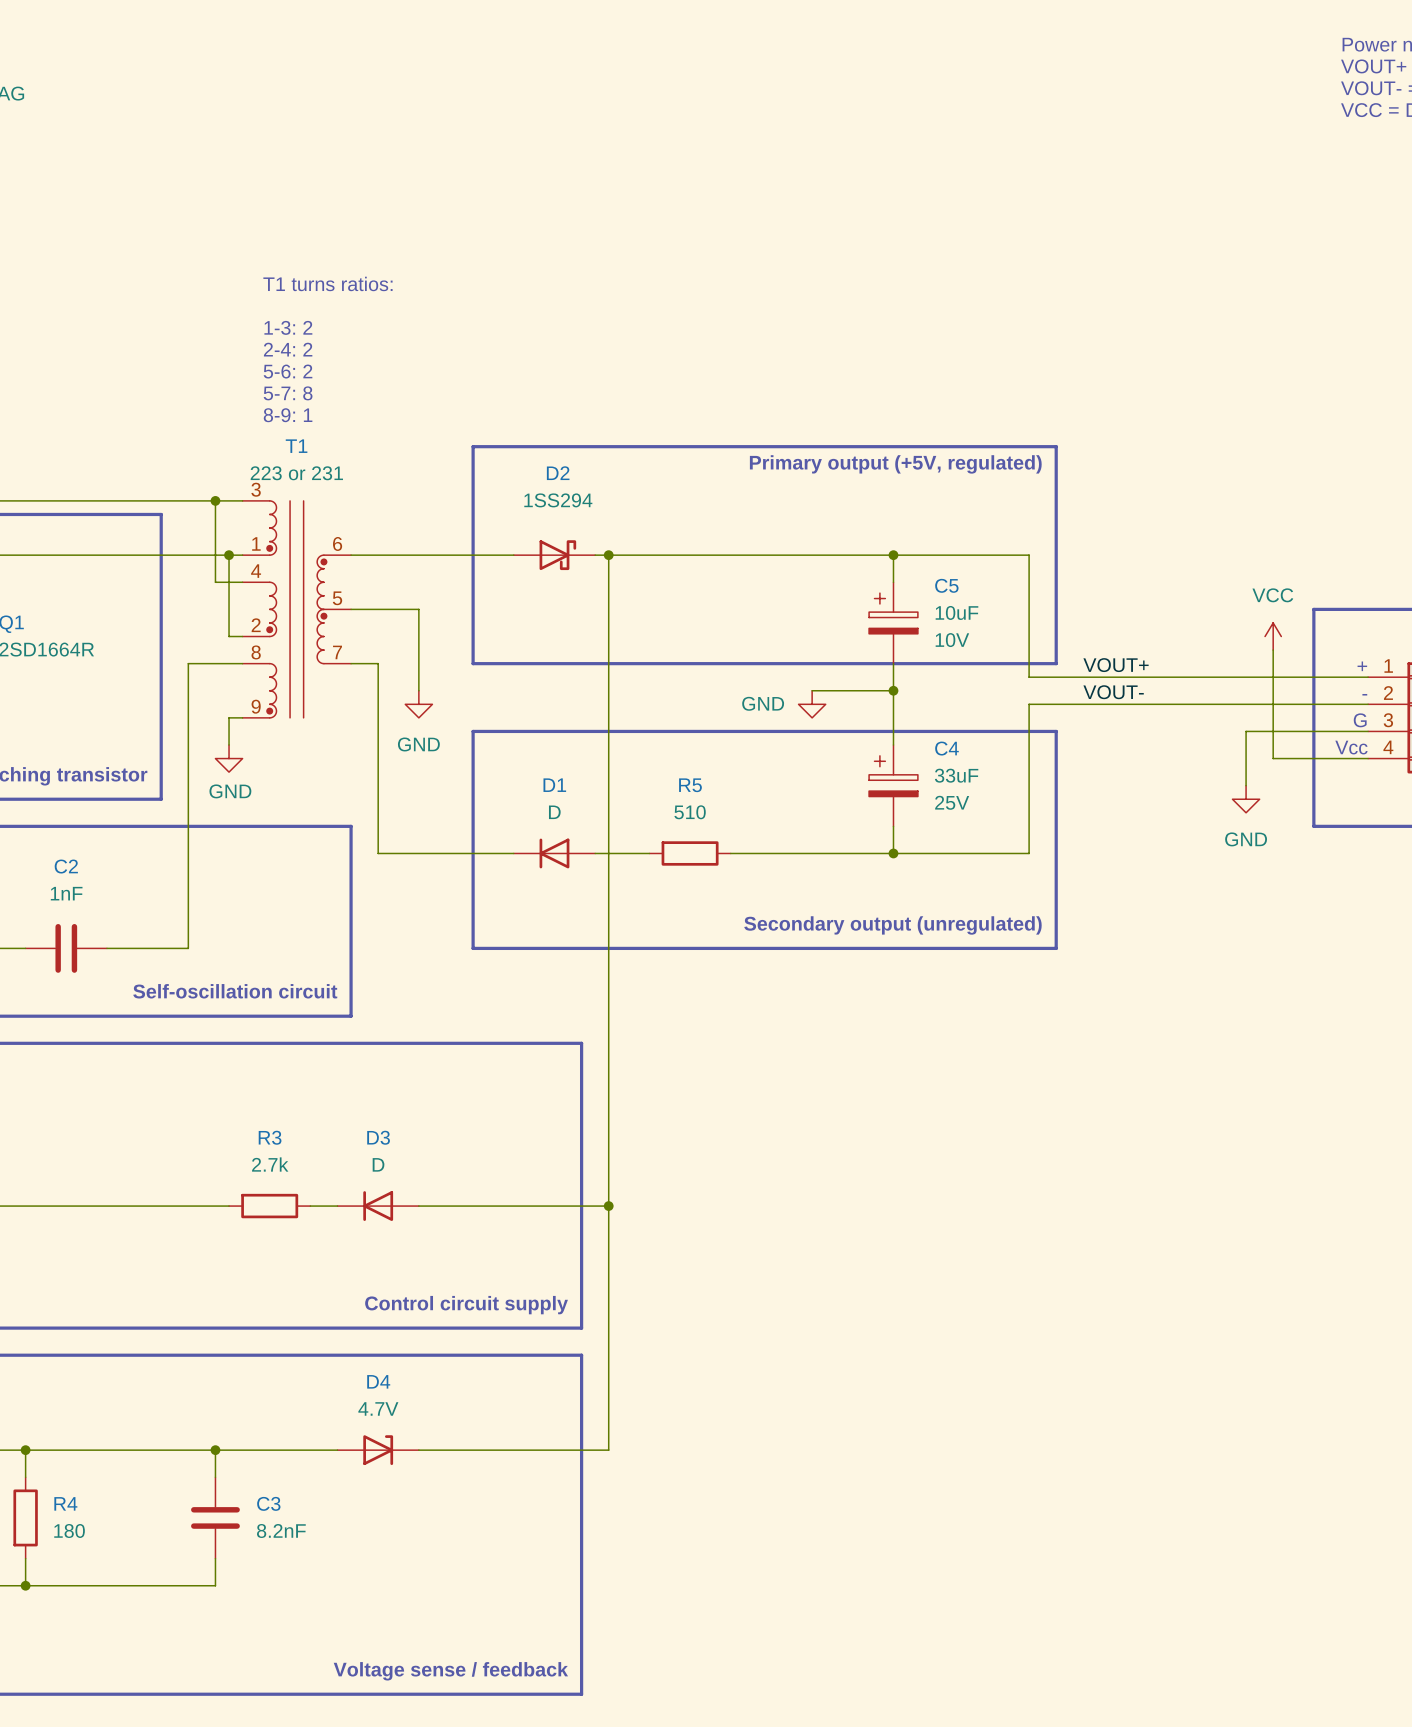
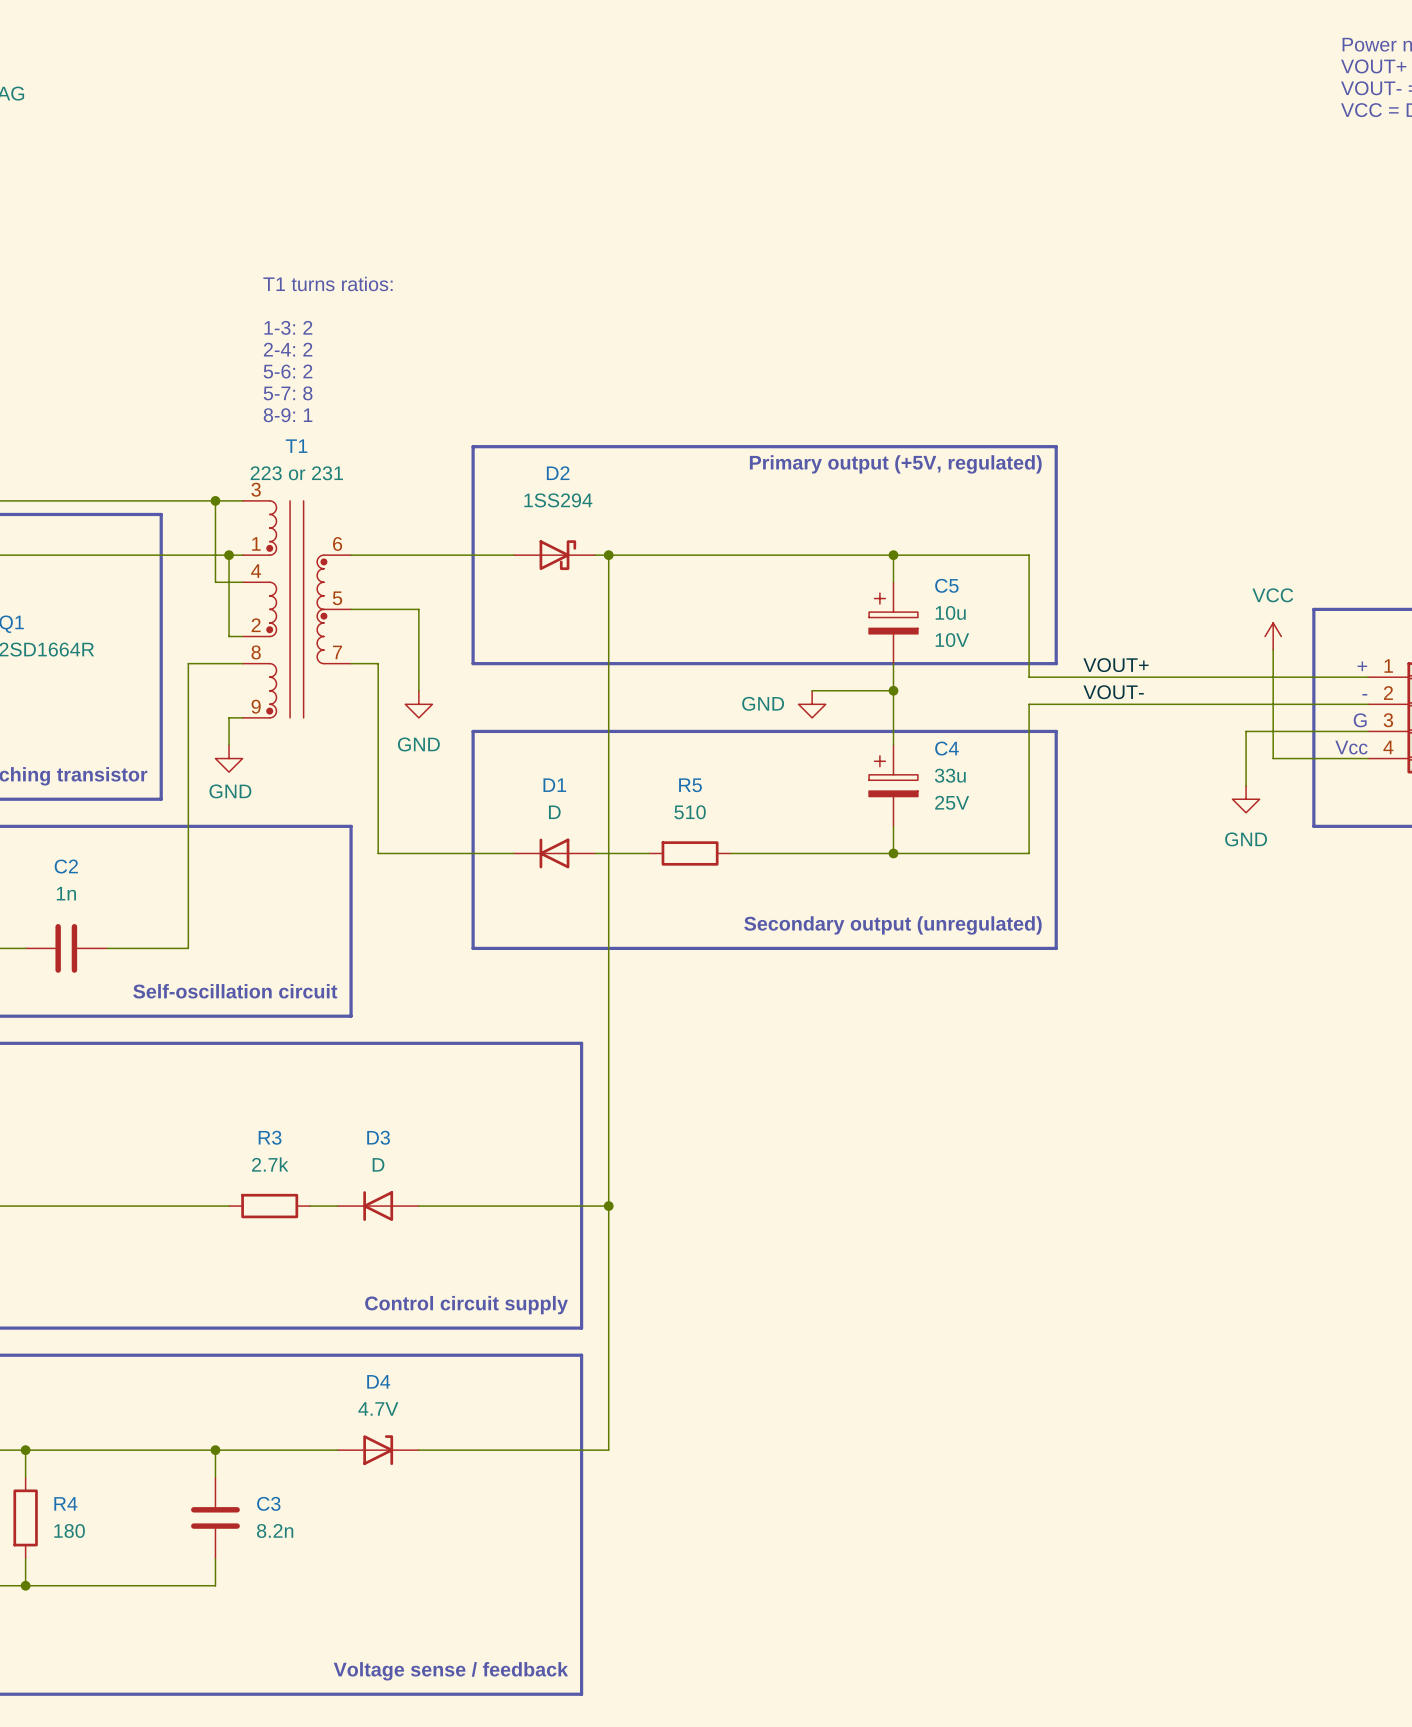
C5 value: 10uF (956, 612) -> 10u (950, 612)
C4 value: 33uF (956, 775) -> 33u (950, 775)
C2 value: 1nF (66, 893) -> 1n (66, 893)
C3 value: 8.2nF (281, 1530) -> 8.2n (275, 1530)

